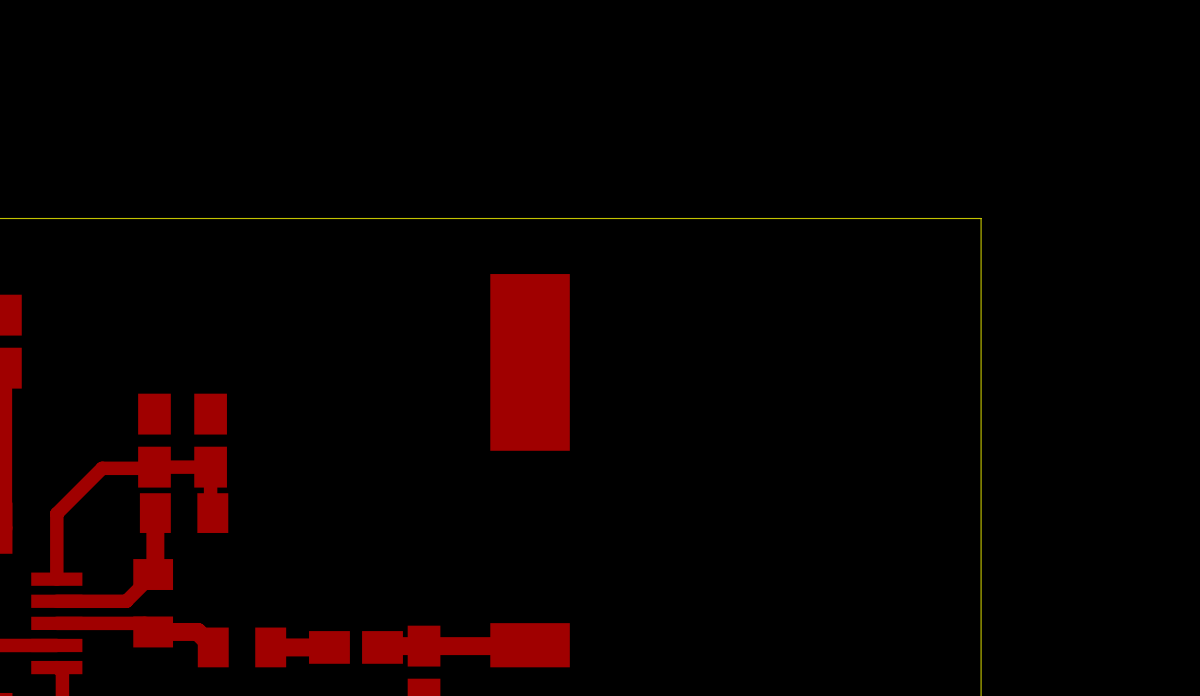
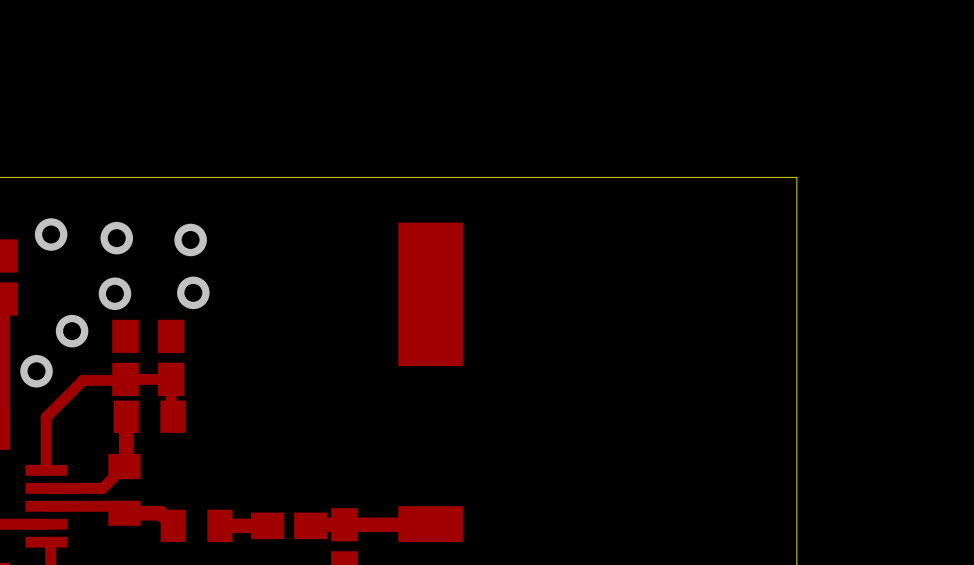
via: none -> (51, 234)
via: none -> (116, 238)
via: none -> (190, 239)
via: none -> (193, 292)
via: none -> (114, 293)
via: none -> (72, 331)
via: none -> (36, 371)

